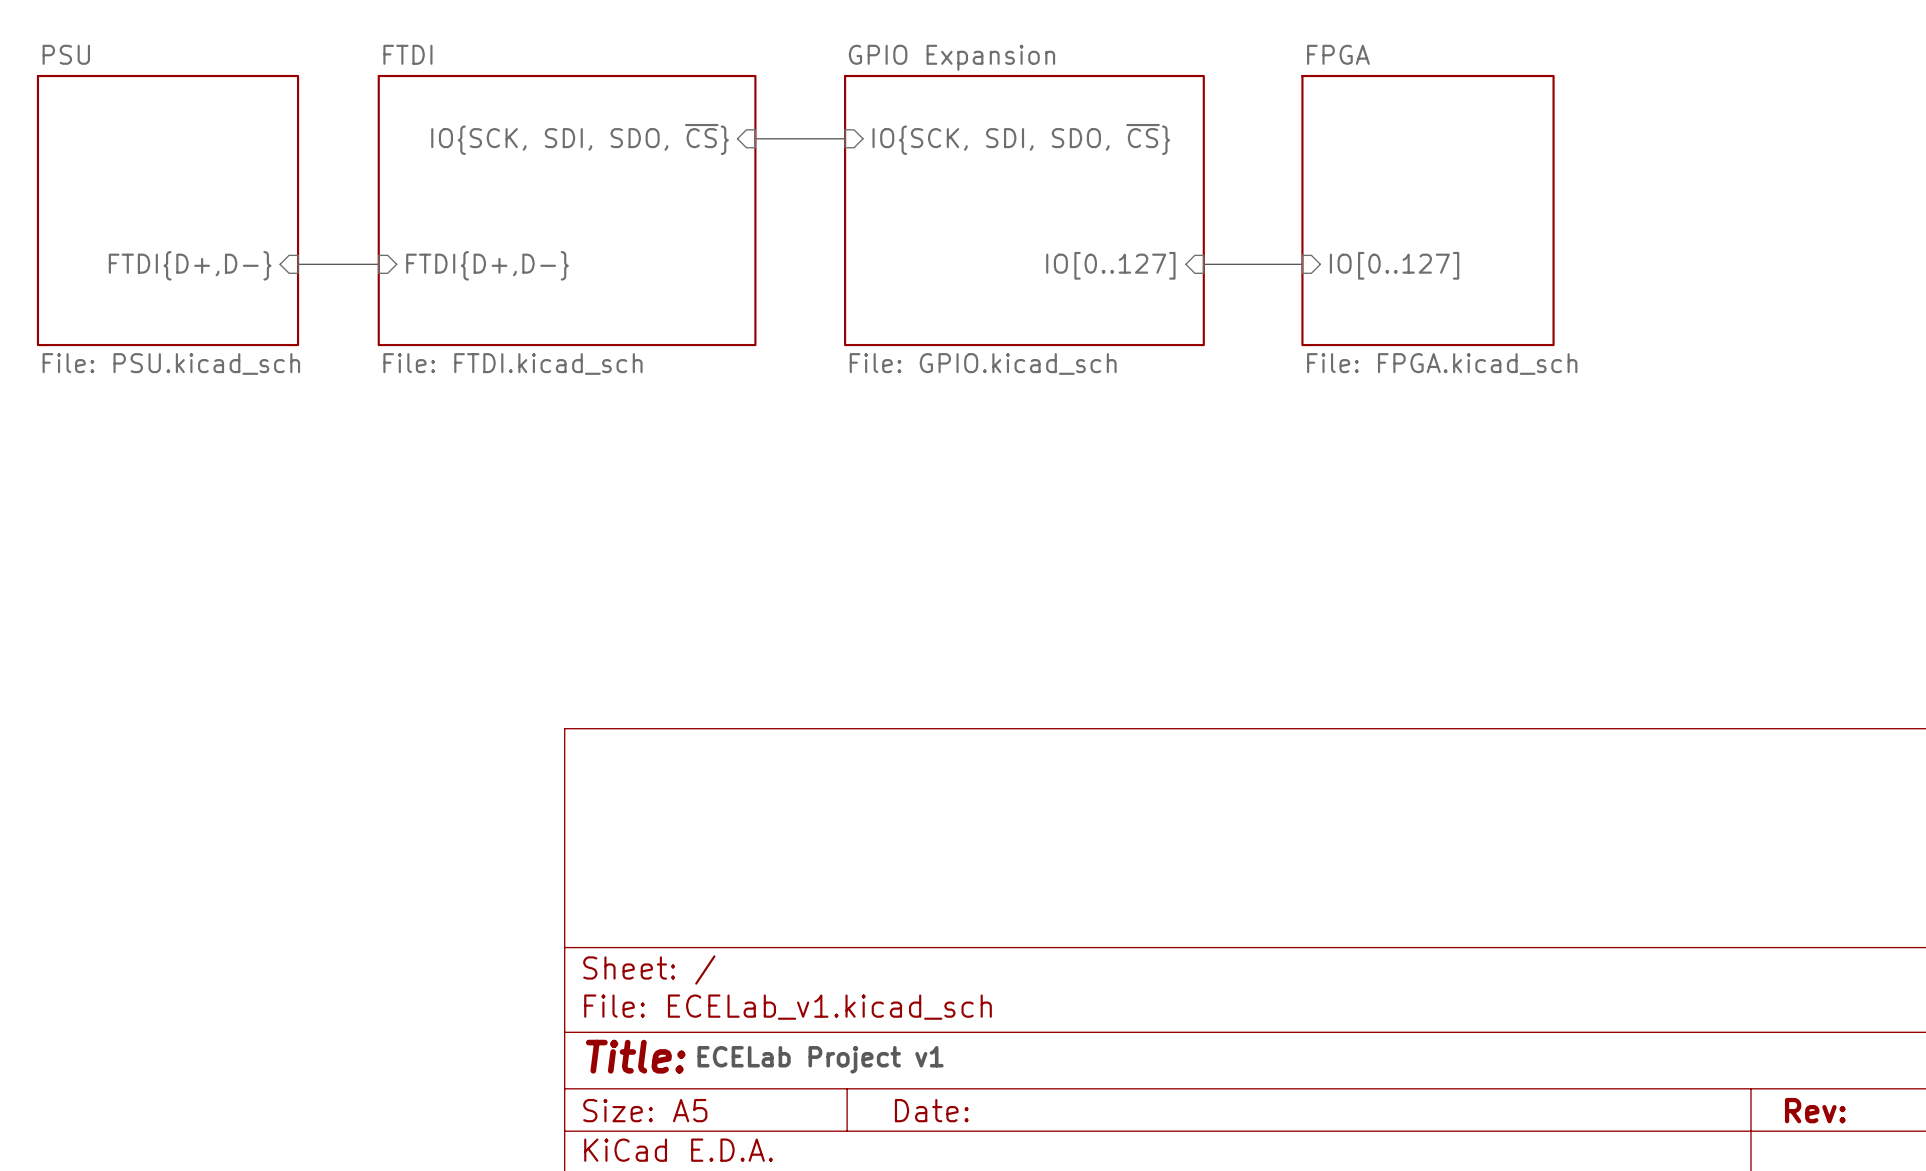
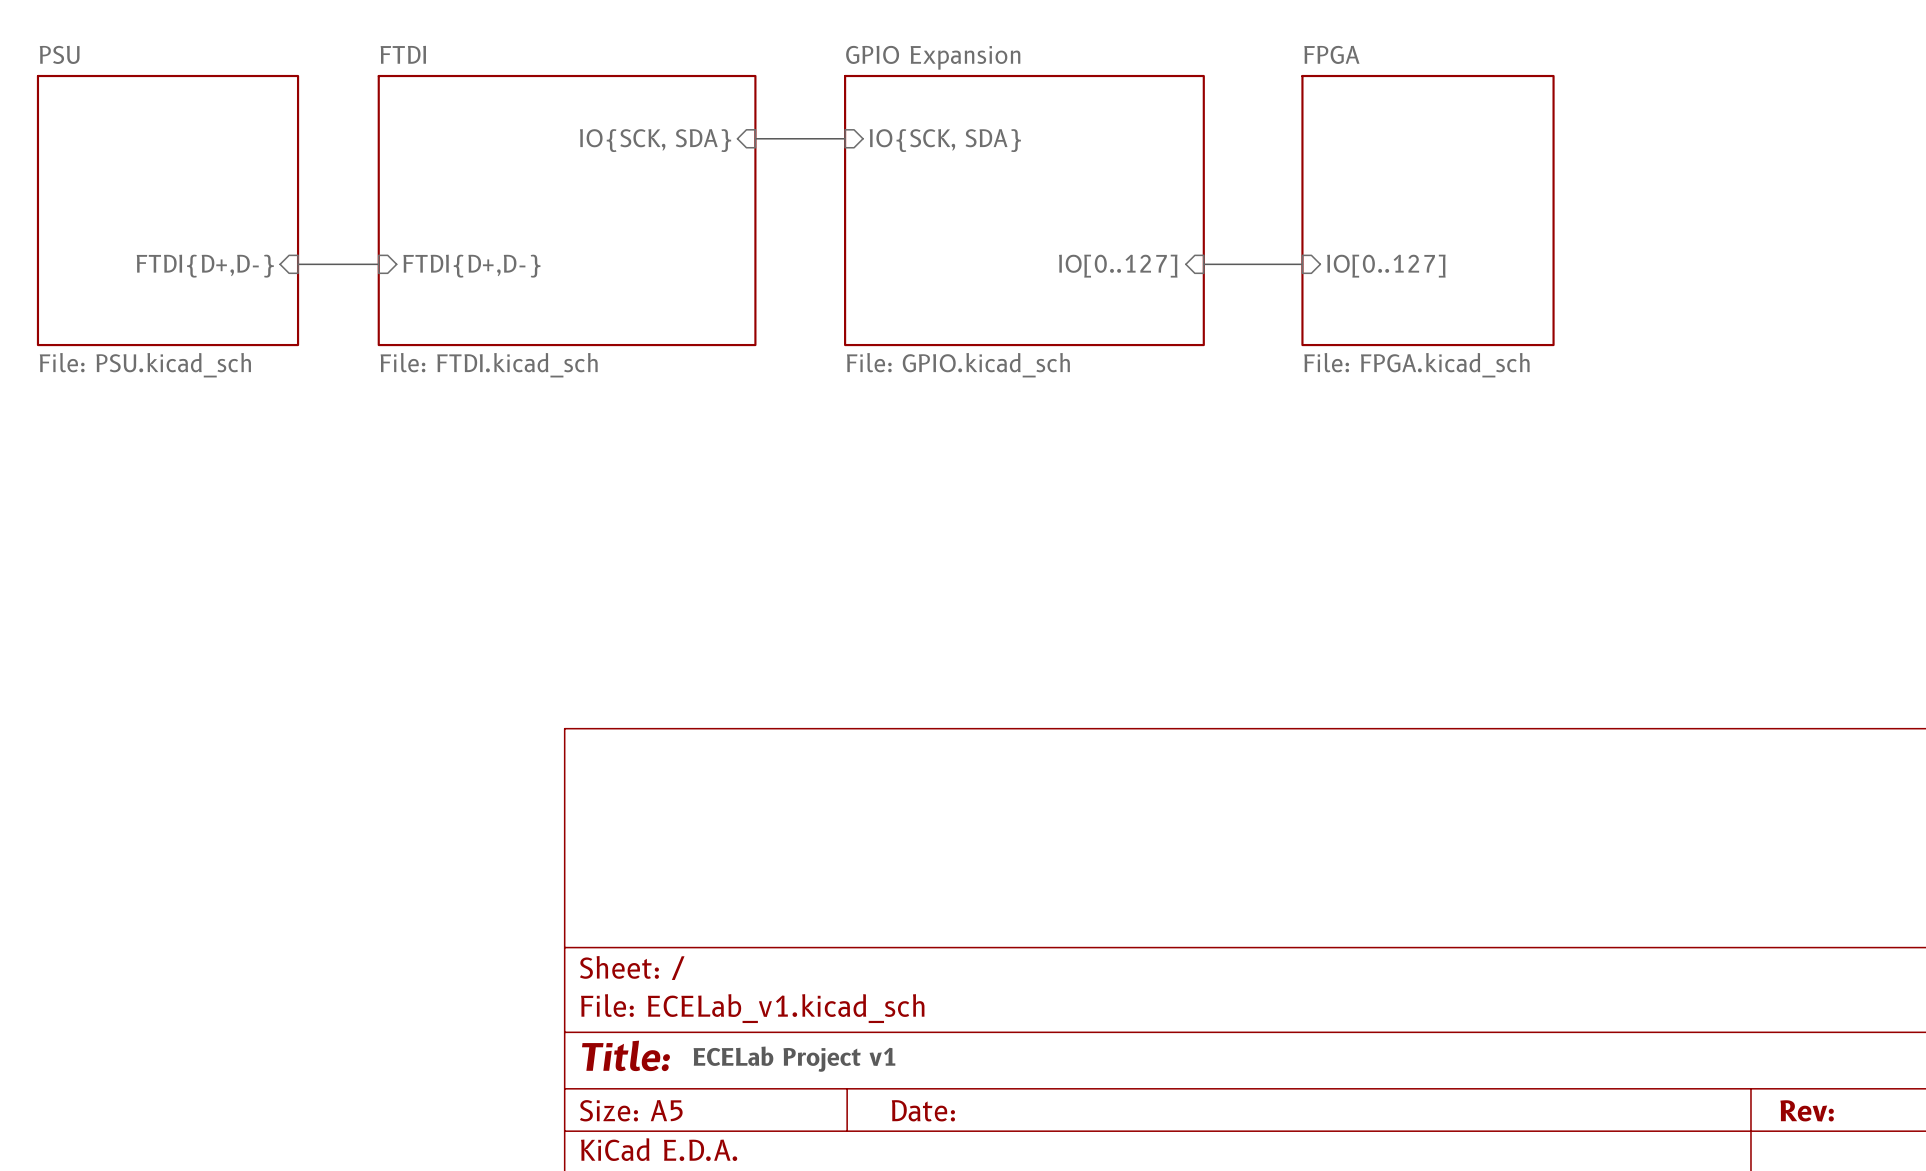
sheet pin: IO{SCK, SDI, SDO, ~{CS}} (580, 139) -> IO{SCK, SDA} (655, 140)
sheet pin: IO{SCK, SDI, SDO, ~{CS}} (1021, 139) -> IO{SCK, SDA} (945, 140)

